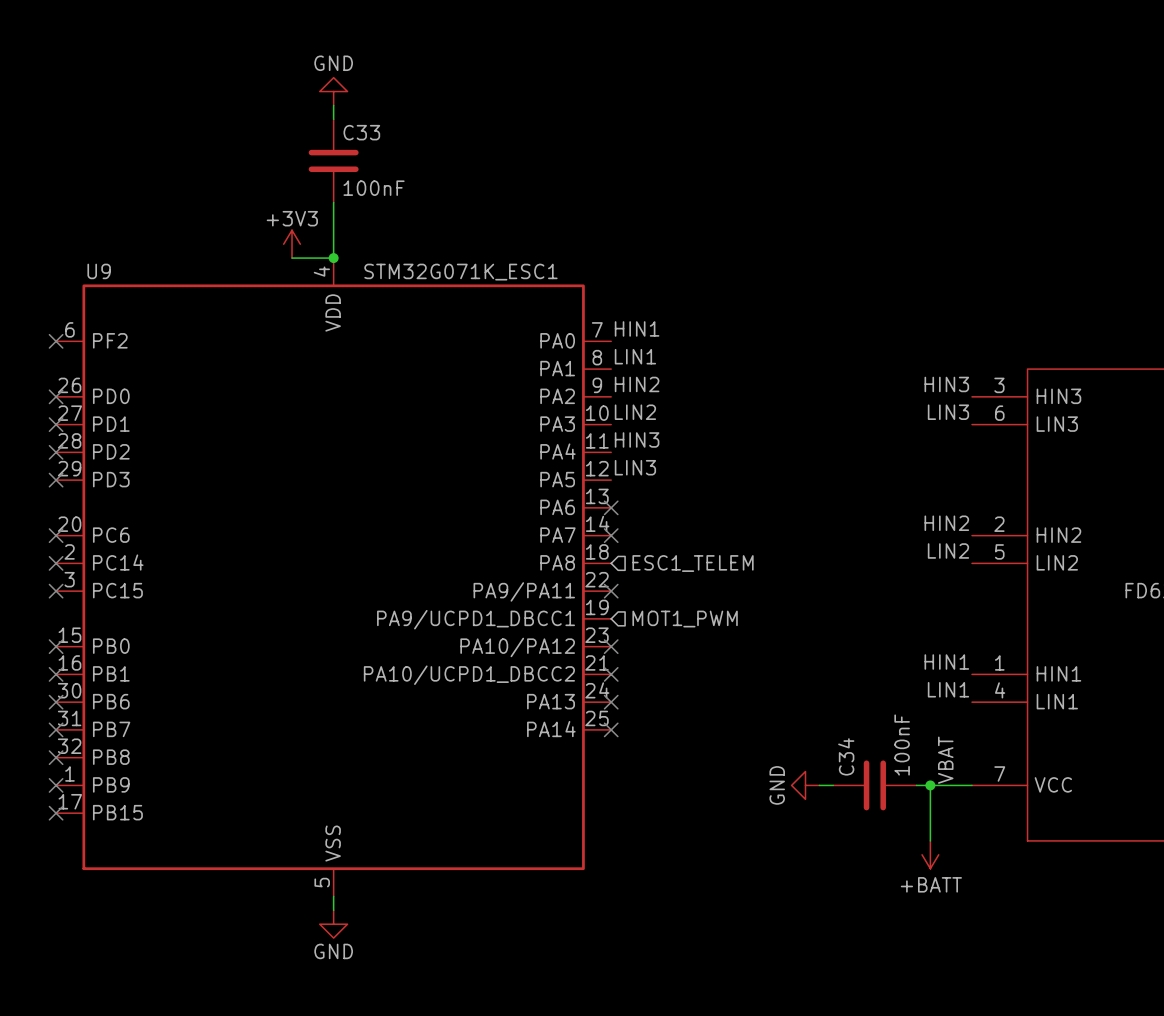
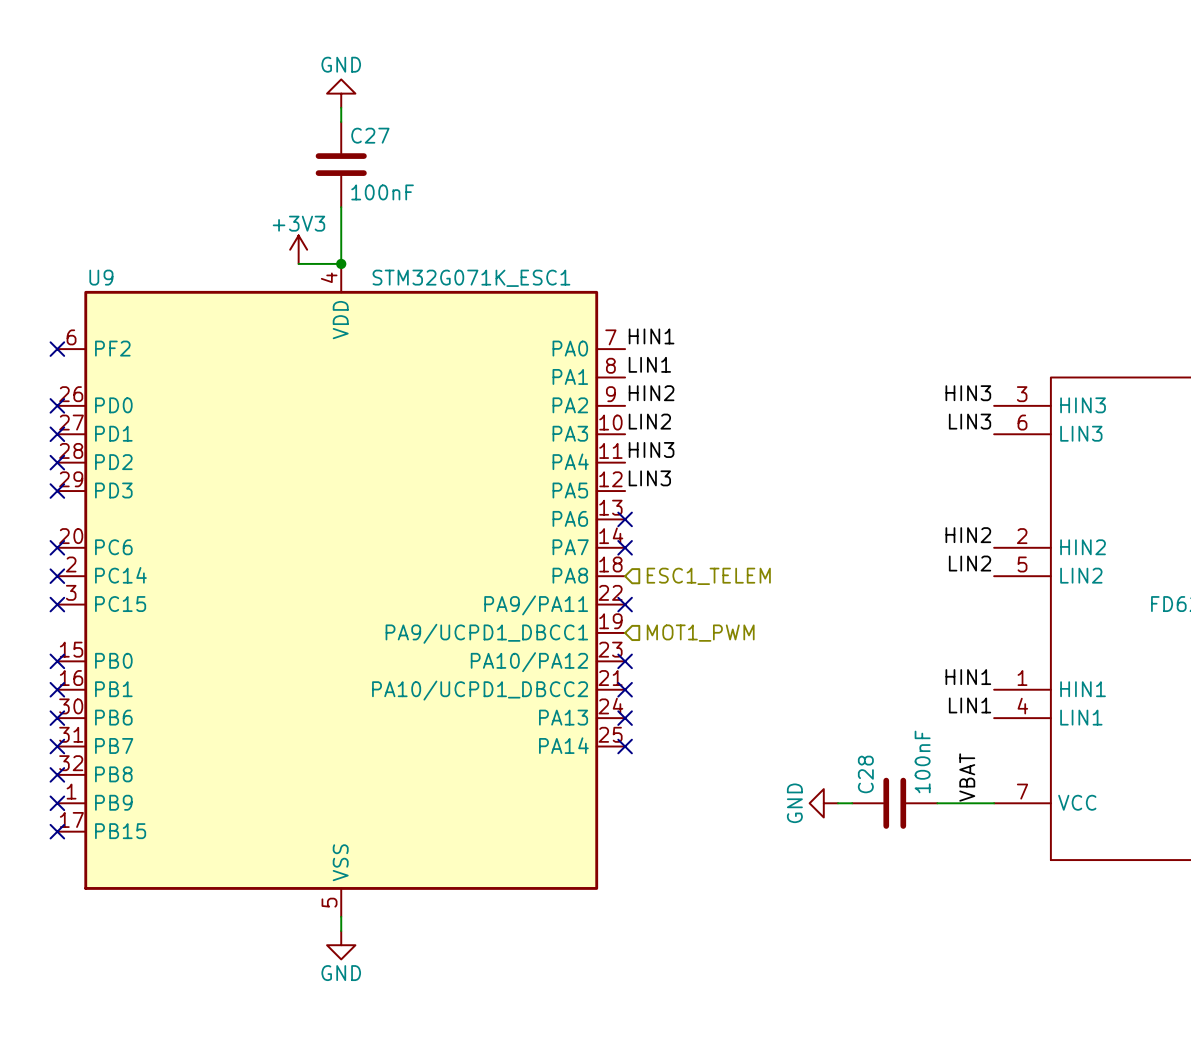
C33 name: C33 (361, 132) -> C27 (370, 135)
C34 name: C34 (846, 756) -> C28 (865, 774)
wire: (930, 785) (930, 840) -> none
junction: (930, 785) -> none
power symbol: +BATT (930, 854) -> none

